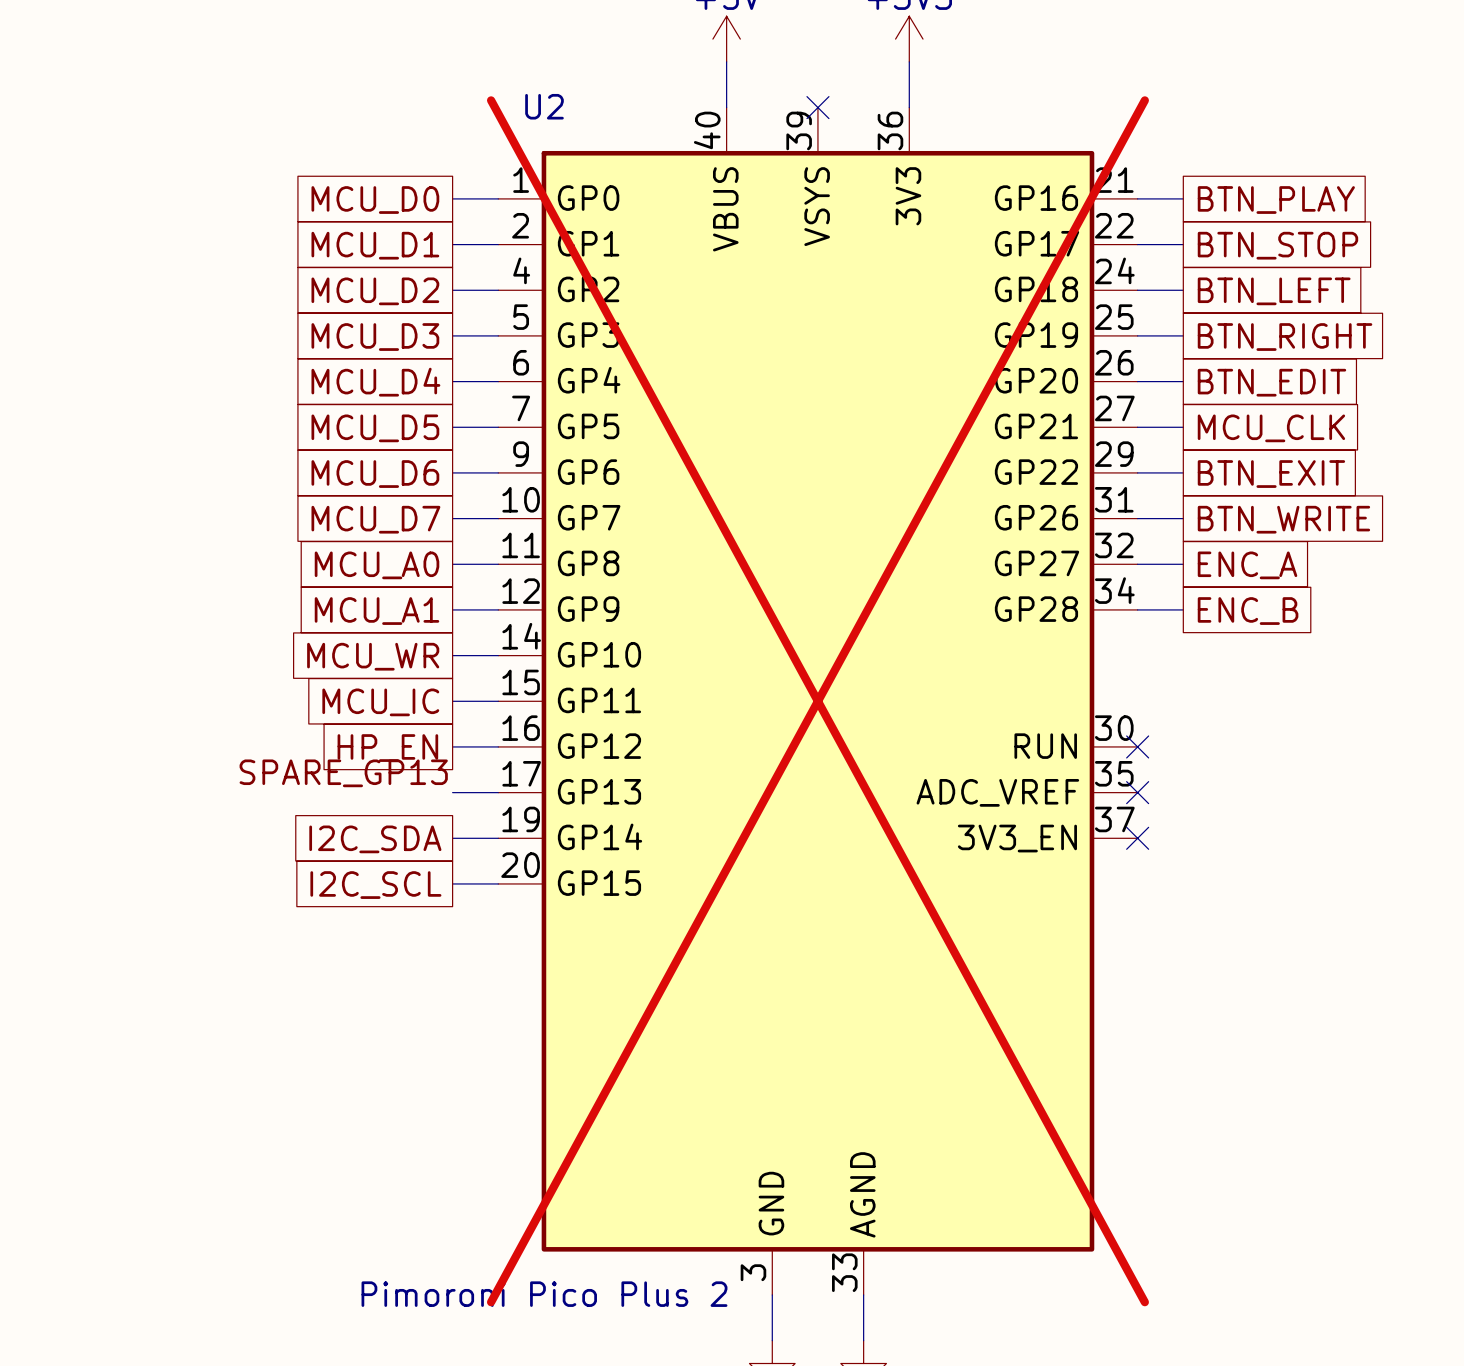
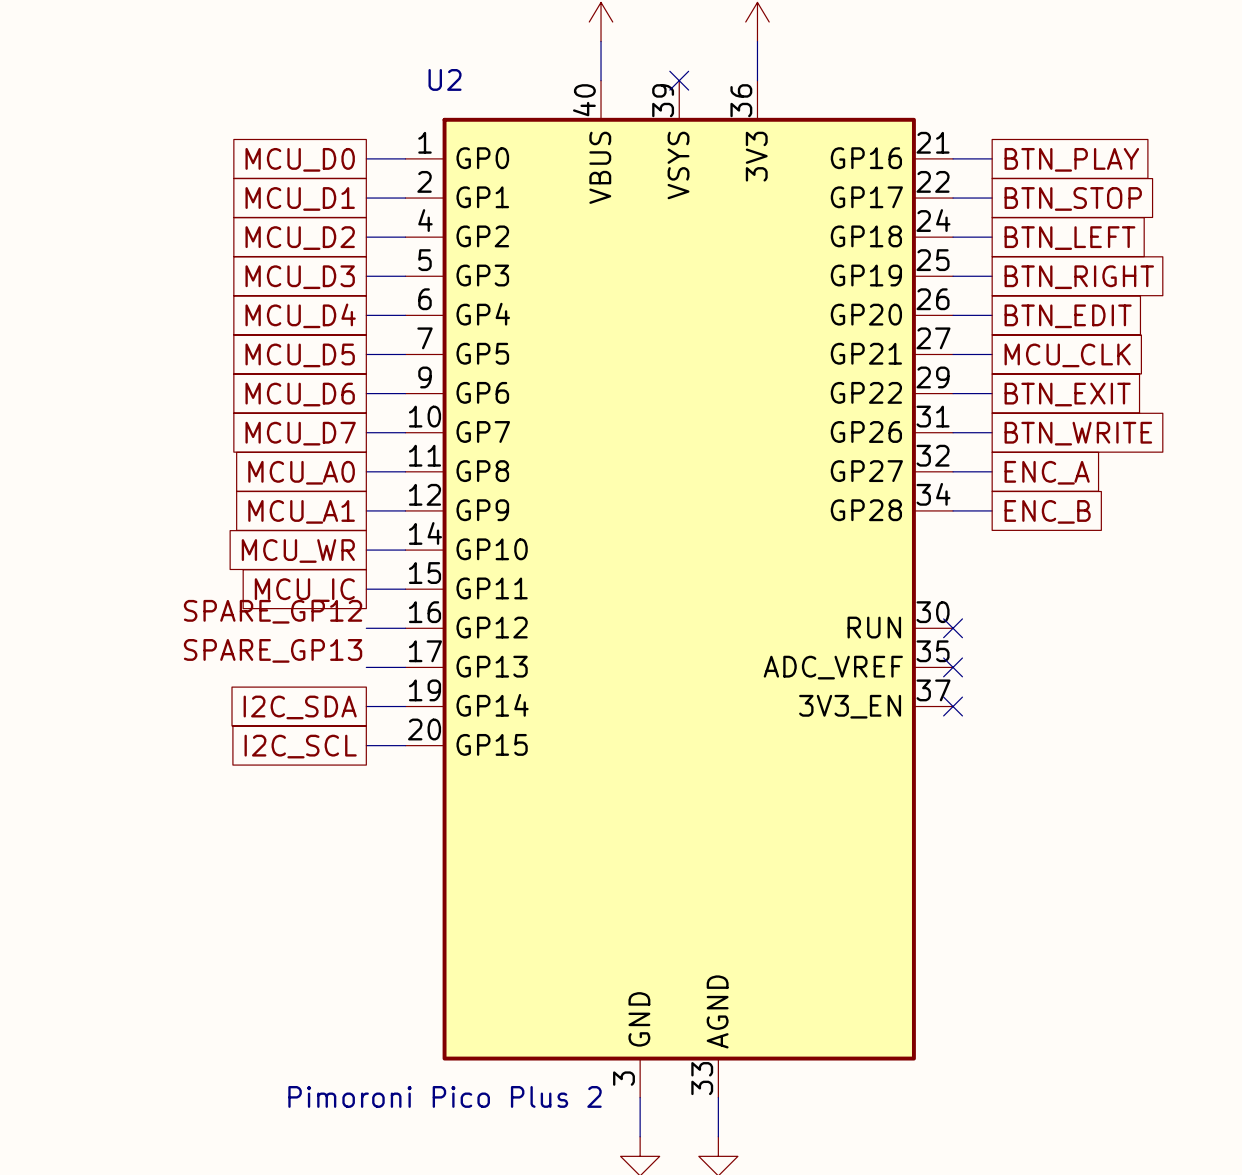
U2 do-not-place cross: (817, 701) -> none
label: none -> SPARE_GP12 (273, 611)
global label: HP_EN (387, 748) -> none

